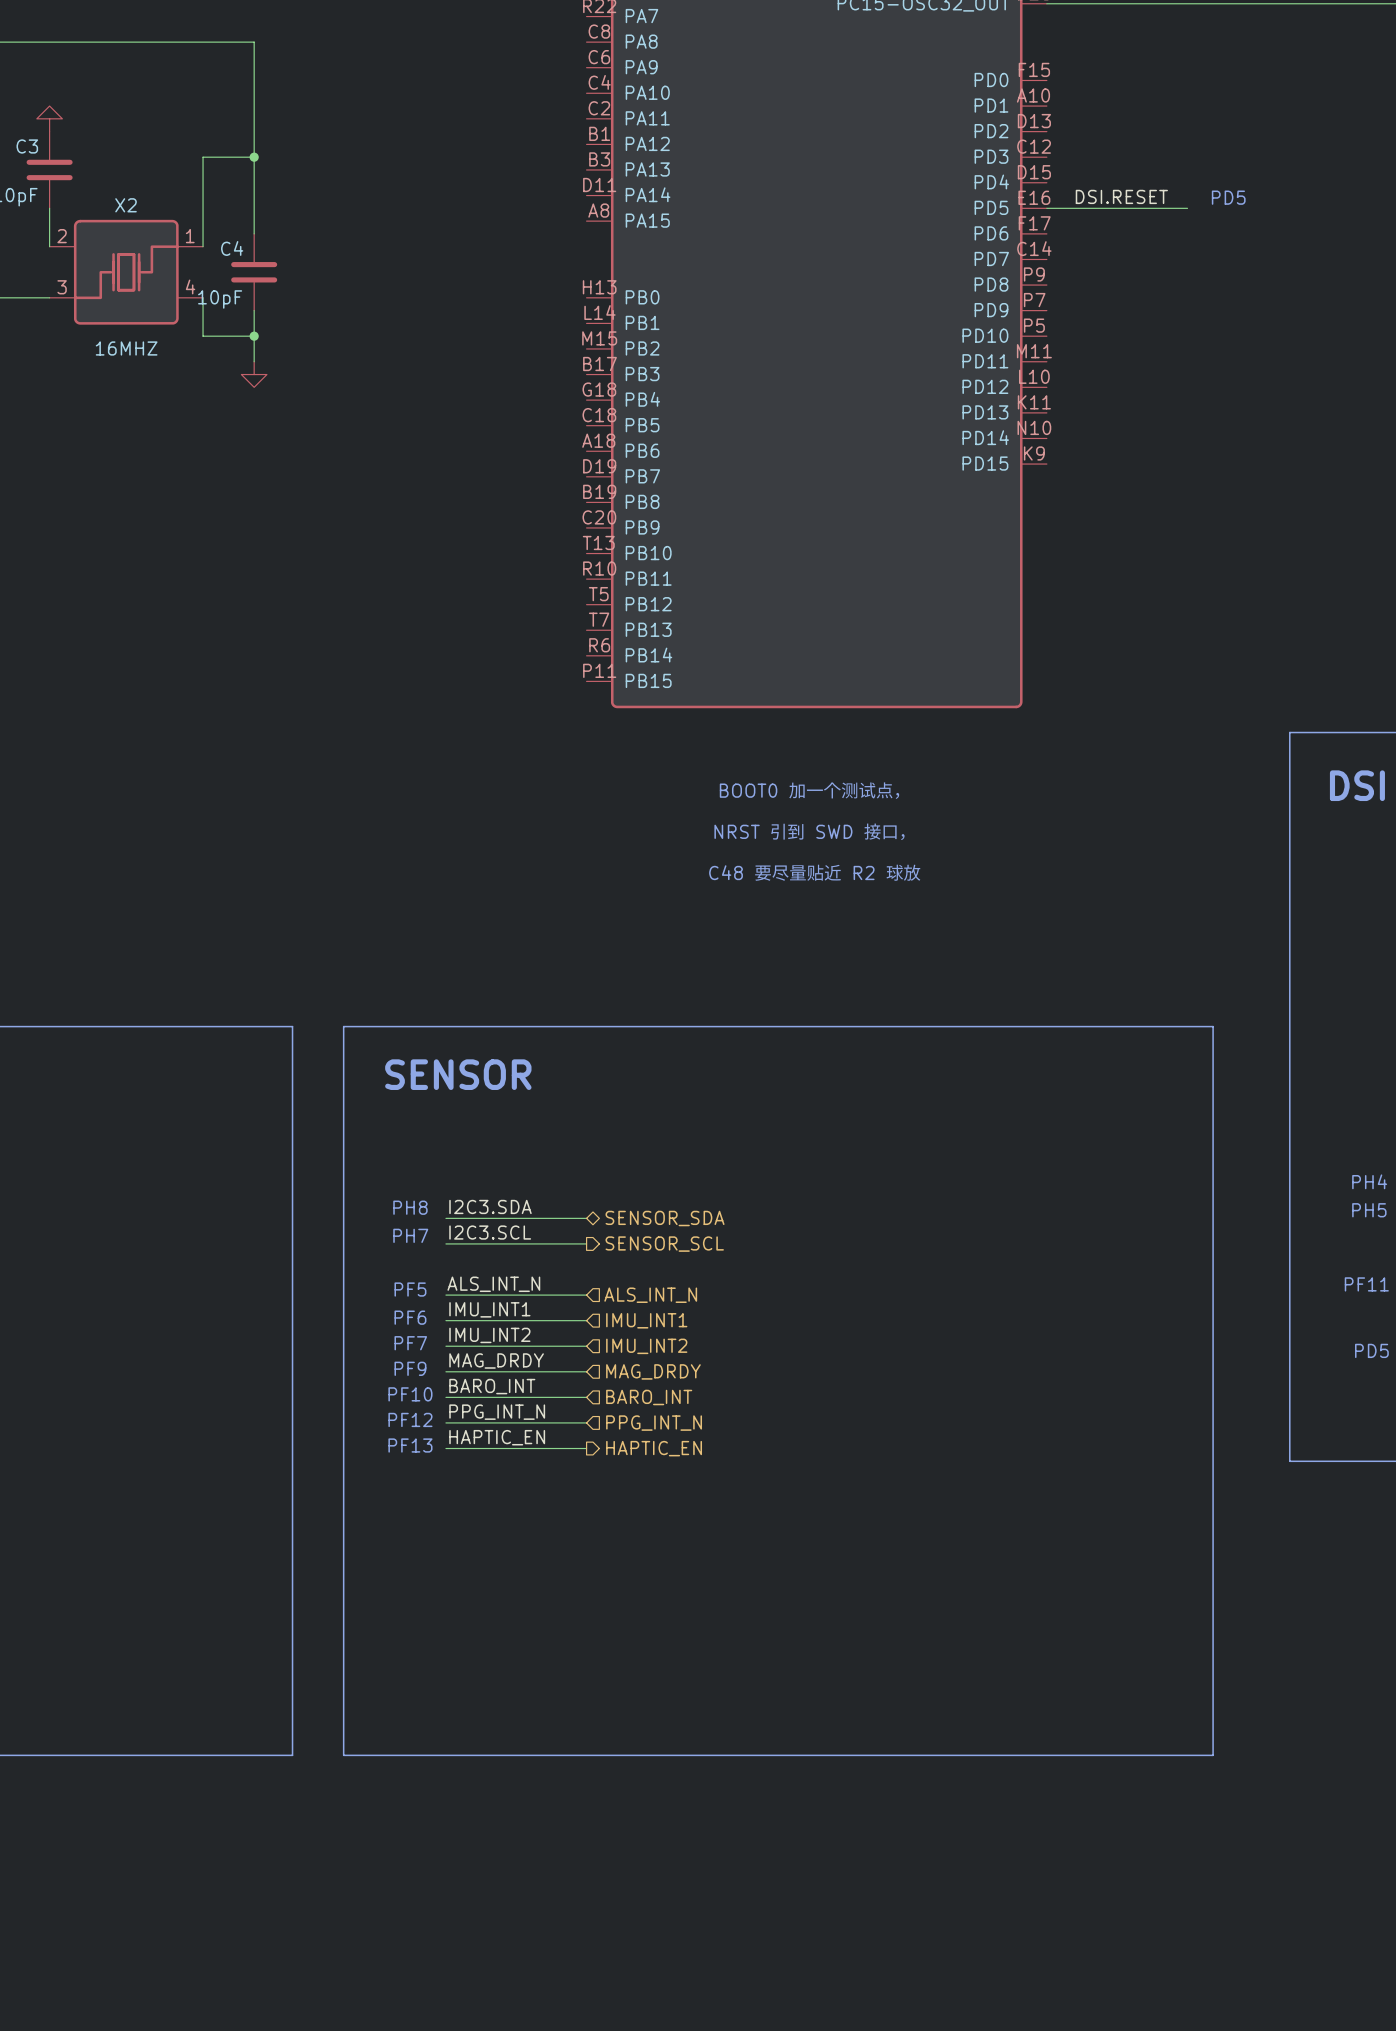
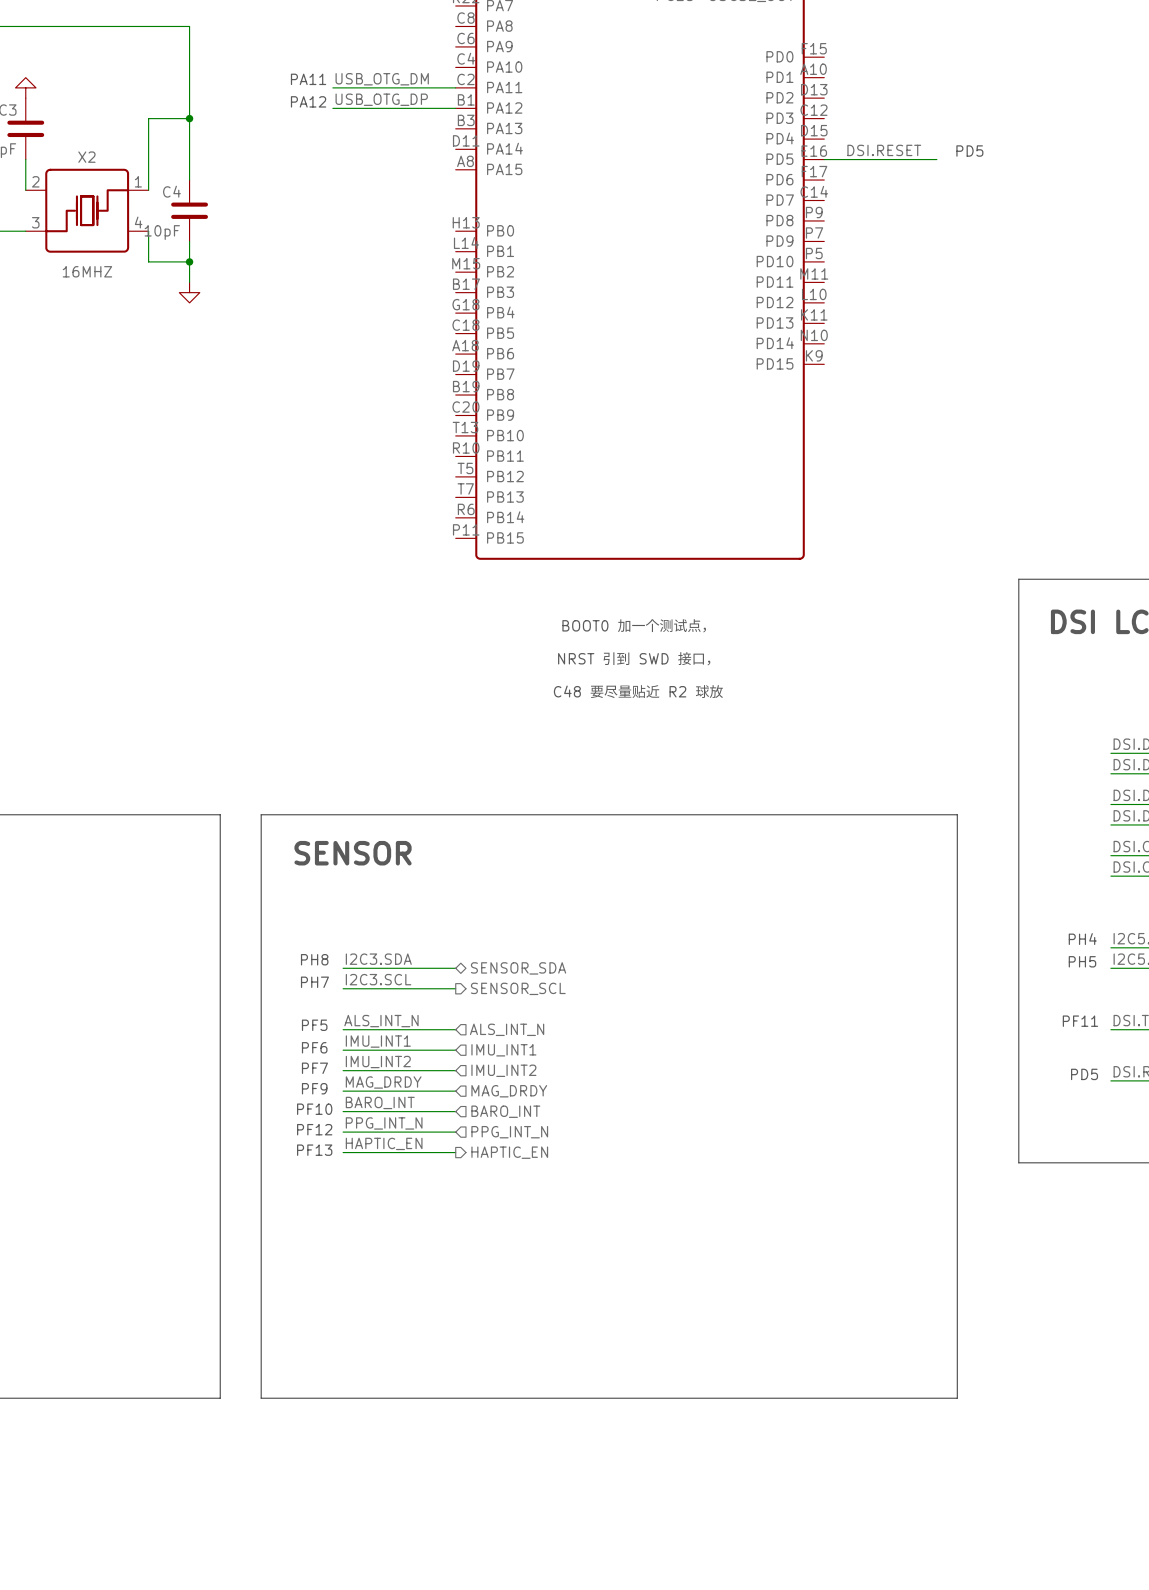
text: none -> PA11 (308, 79)
label: none -> USB_OTG_DM (382, 79)
wire: none -> (332, 87) (455, 87)
label: none -> USB_OTG_DP (381, 99)
text: none -> PA12 (308, 101)
wire: none -> (332, 108) (455, 108)

